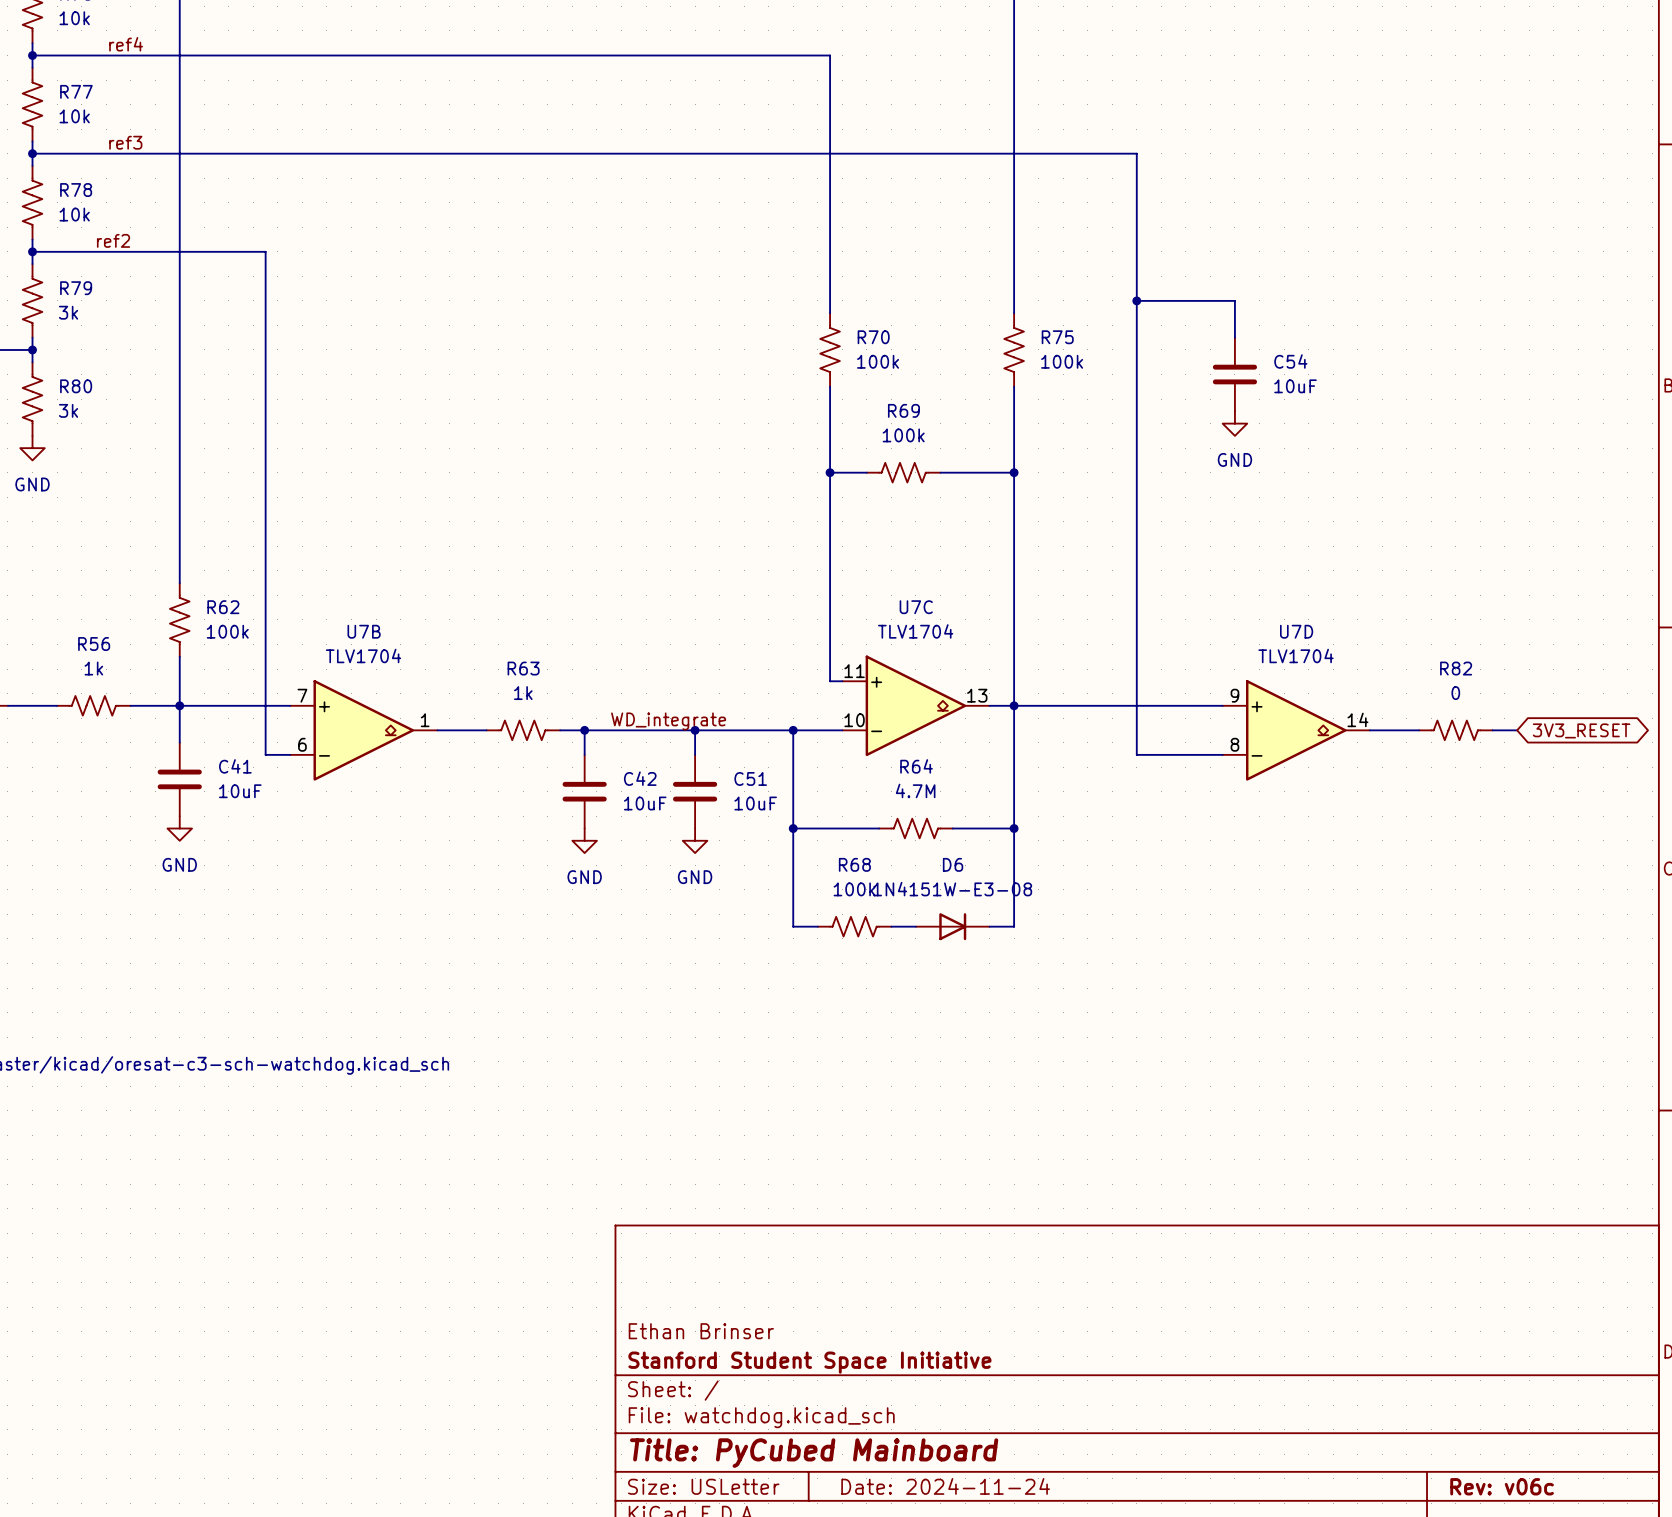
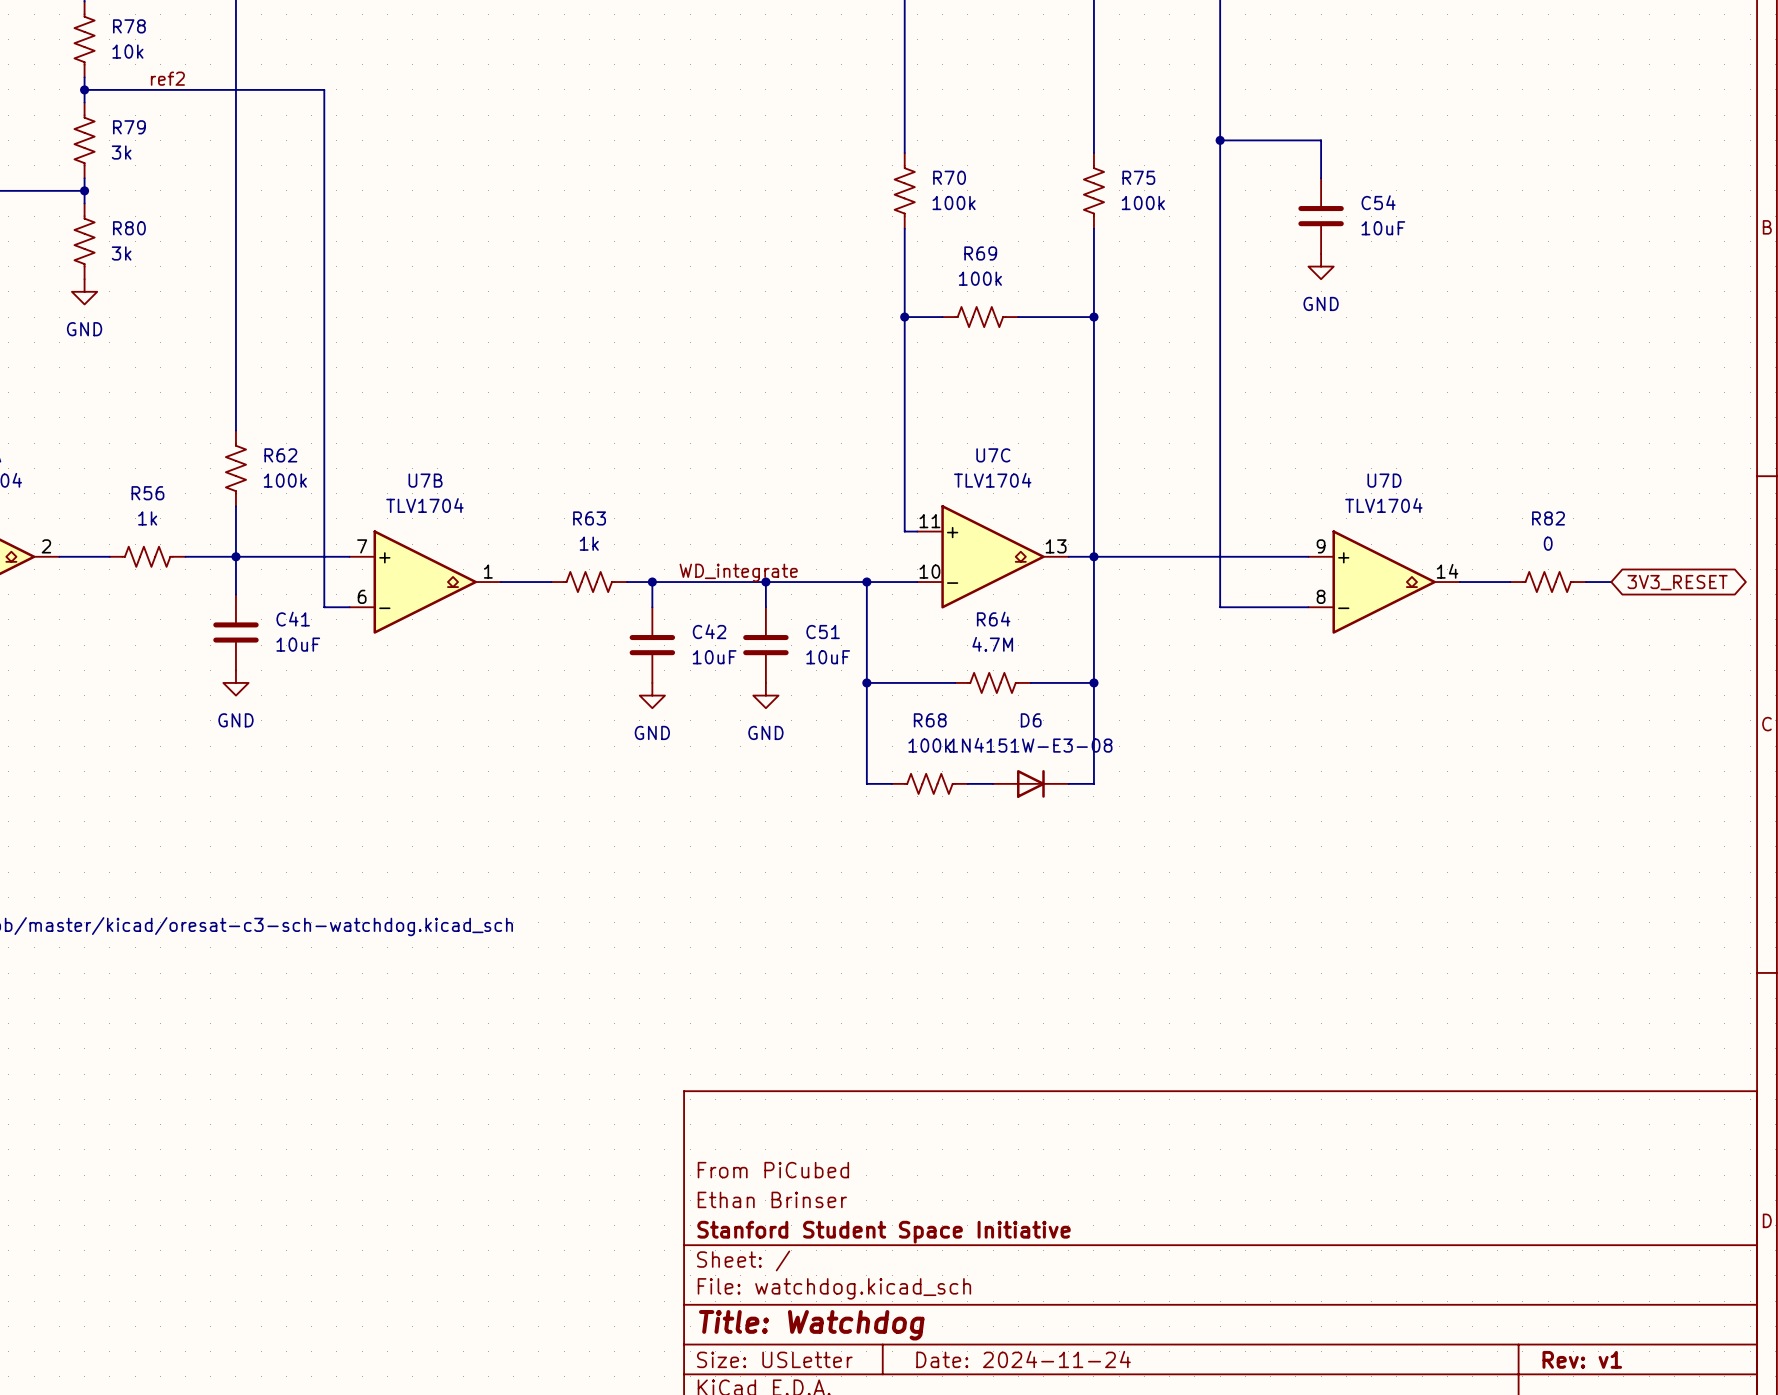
title block: none -> From PiCubed (773, 1170)
title block: Title: PyCubed Mainboard (814, 1453) -> Title: Watchdog (811, 1325)
title block: Rev: v06c (1502, 1486) -> Rev: v1 (1582, 1359)

